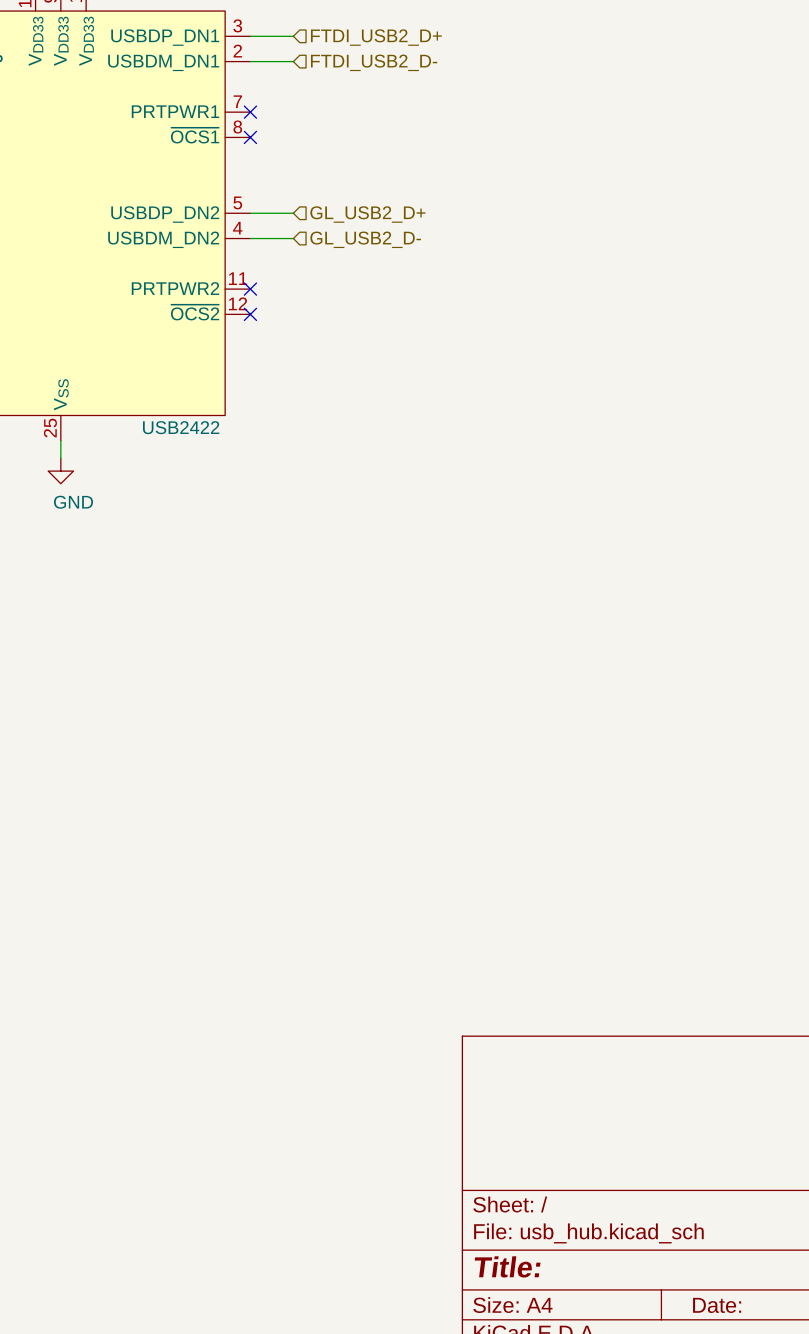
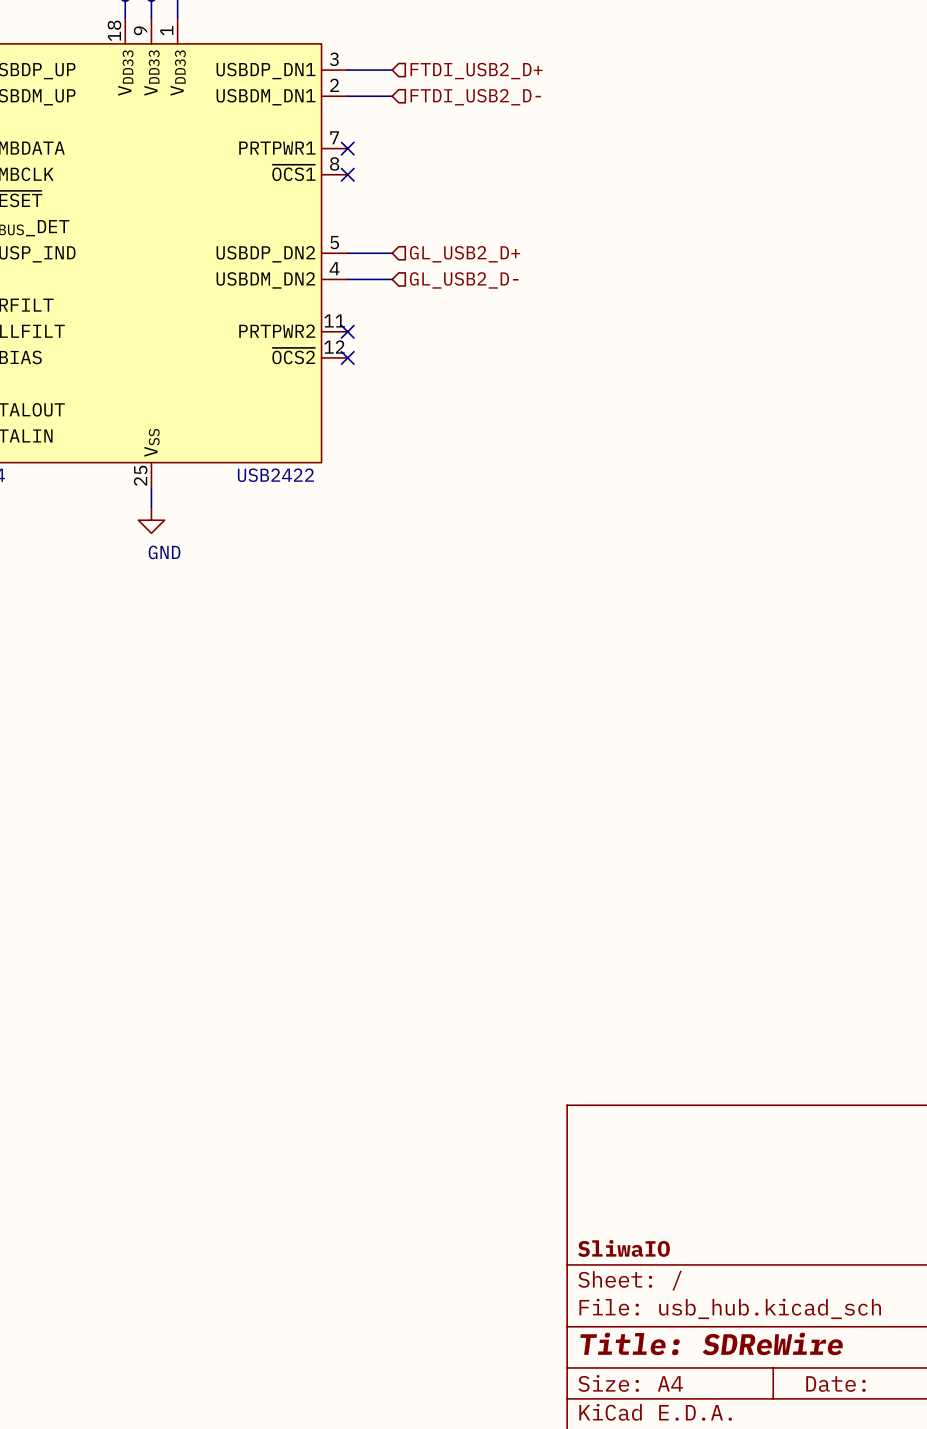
title block: none -> SliwaIO (624, 1248)
title block: Title: (507, 1266) -> Title: SDReWire (711, 1343)

